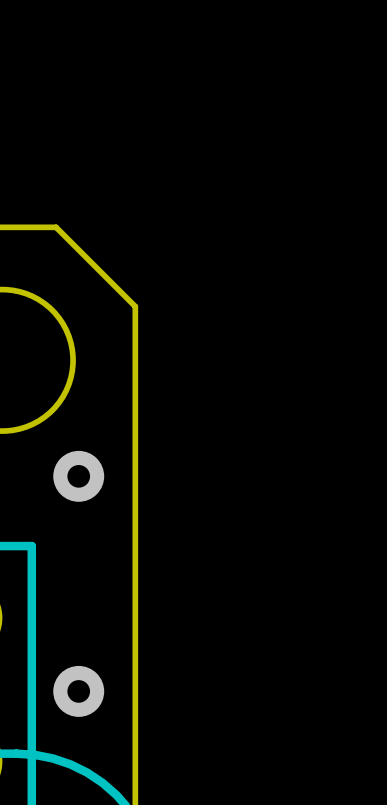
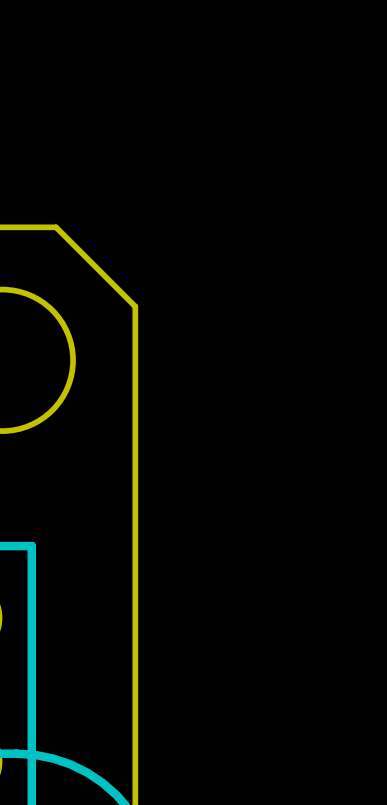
via: (78, 476) -> none
via: (78, 691) -> none

